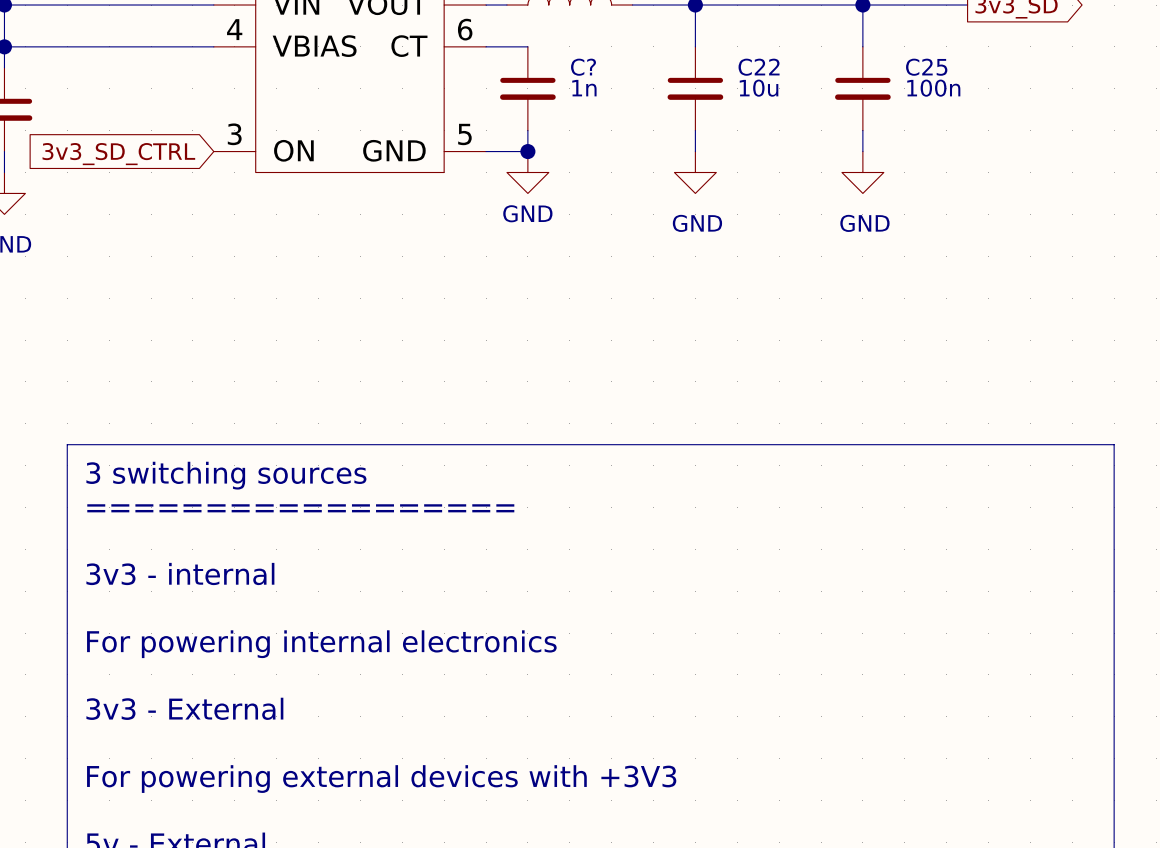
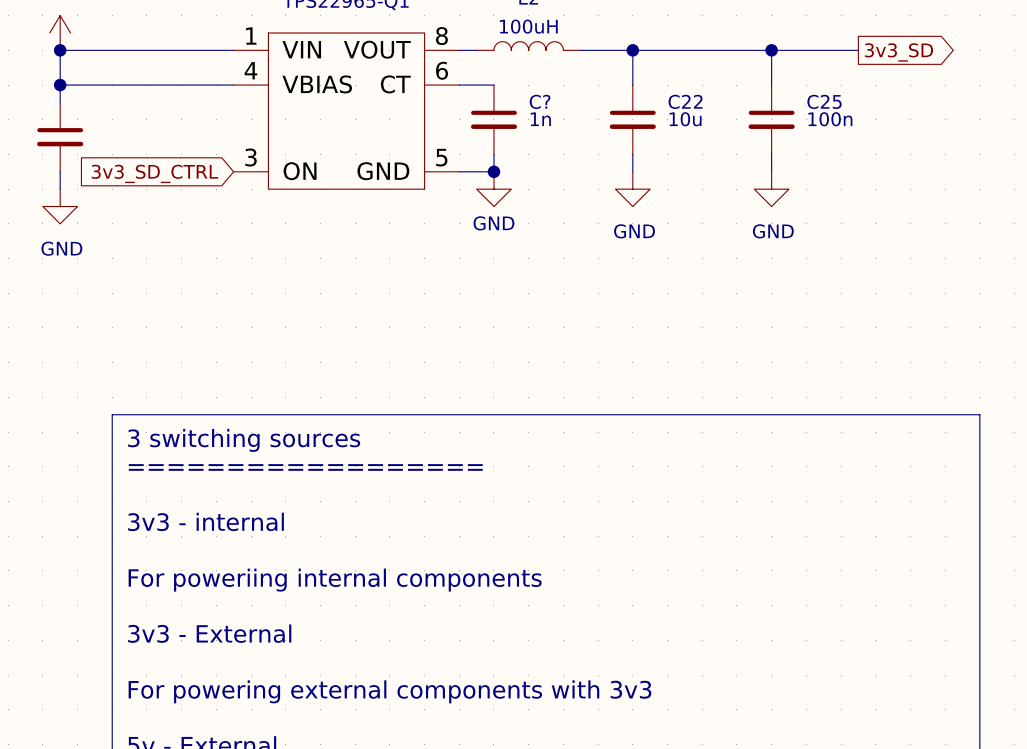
text: For powering internal electronics (321, 644) -> For poweriing internal components (335, 580)
text: For powering external devices with +3V3 (381, 779) -> For powering external components with 3v3 (389, 691)

